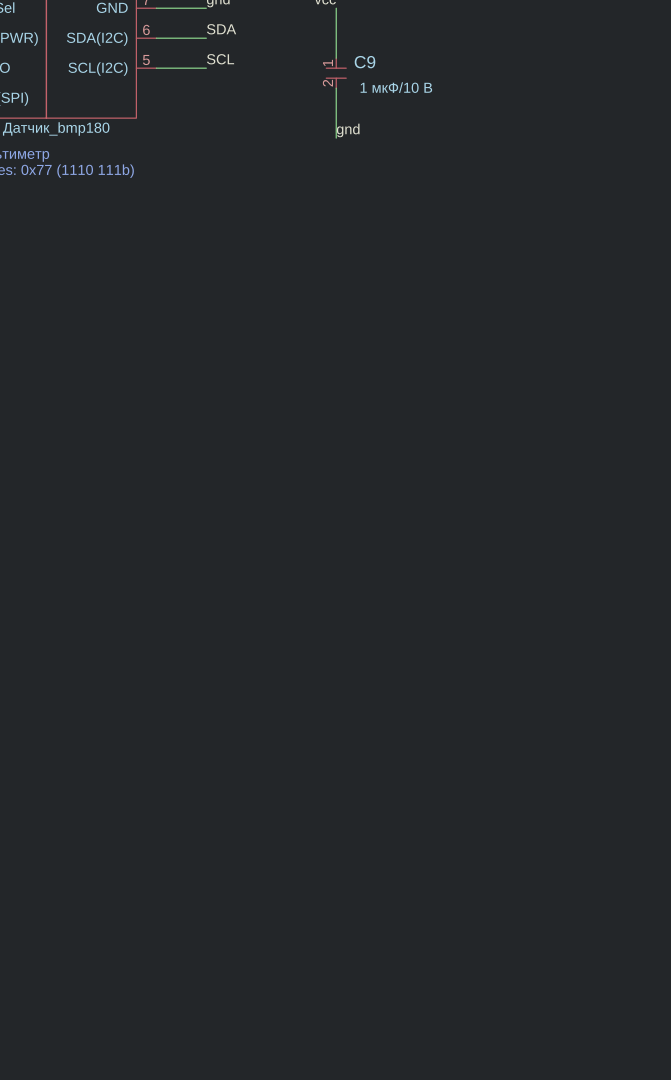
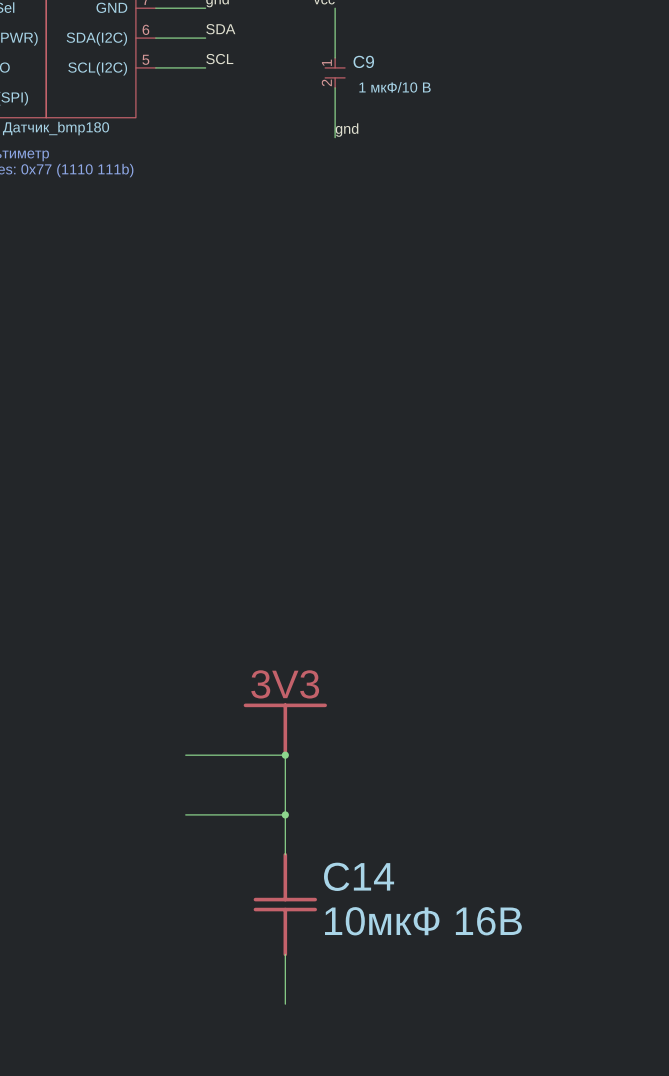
power symbol: none -> (285, 730)
wire: none -> (185, 755) (285, 755) (285, 854)
junction: none -> (285, 755)
wire: none -> (185, 814) (285, 814)
junction: none -> (285, 814)
C14: none -> (285, 904)
wire: none -> (285, 954) (285, 1004)

